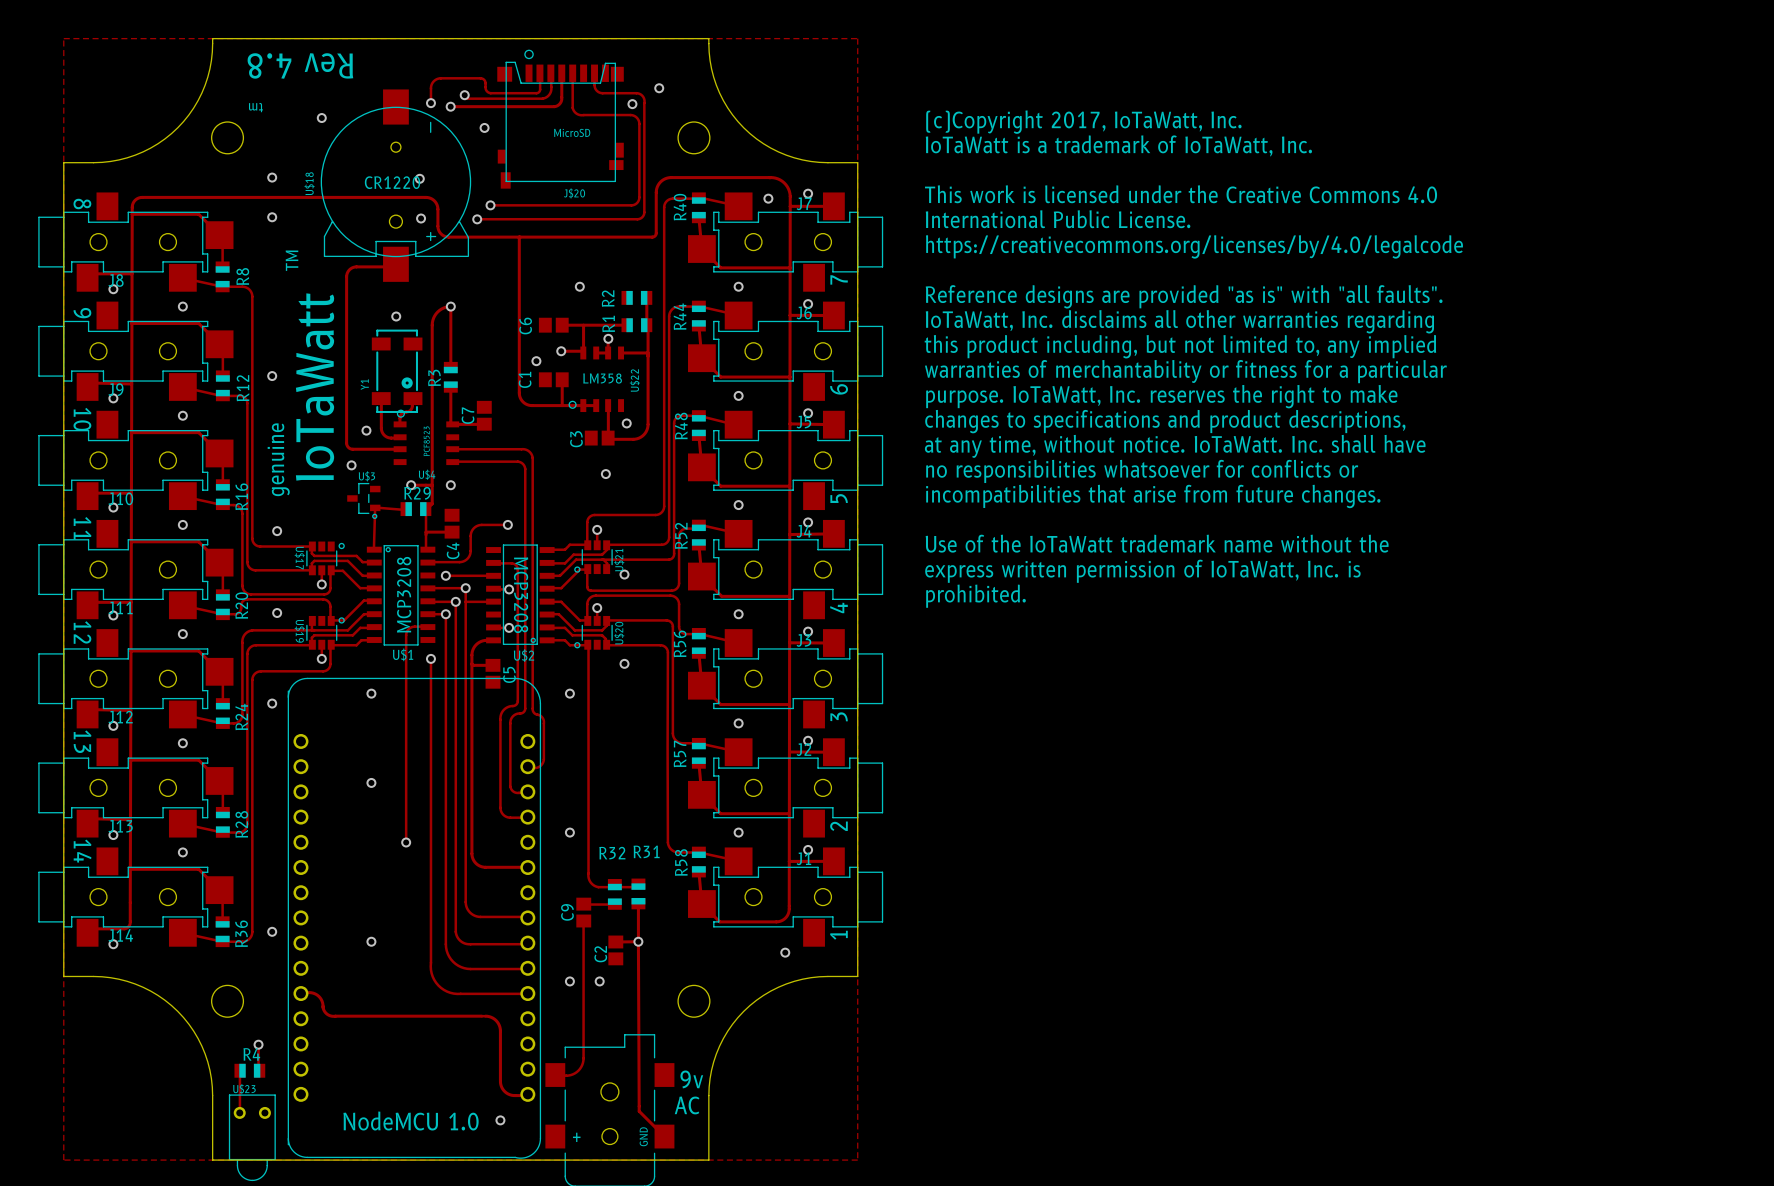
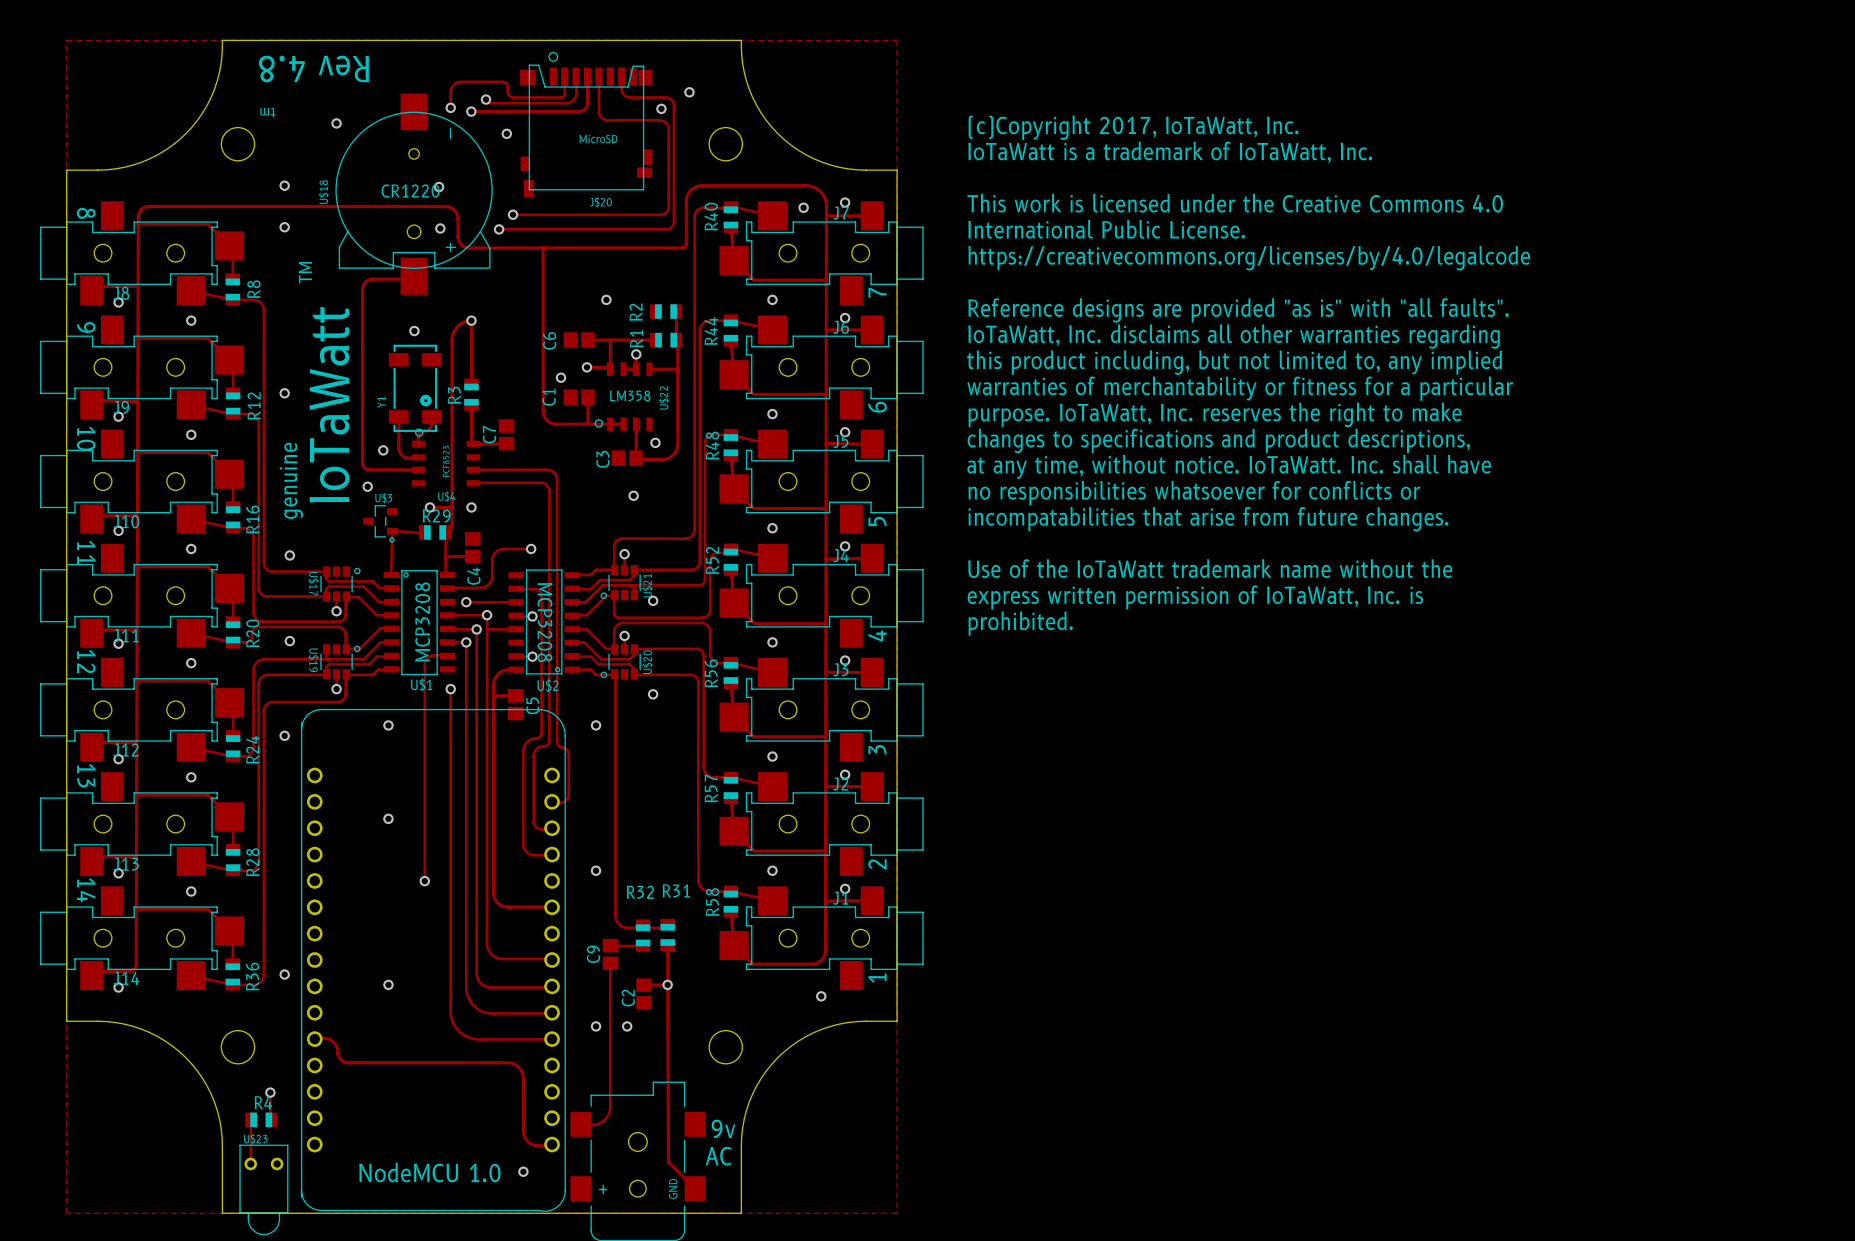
text: incompatibilities that arise from future changes. (1153, 496) -> incompatabilities that arise from future changes. (1208, 519)

